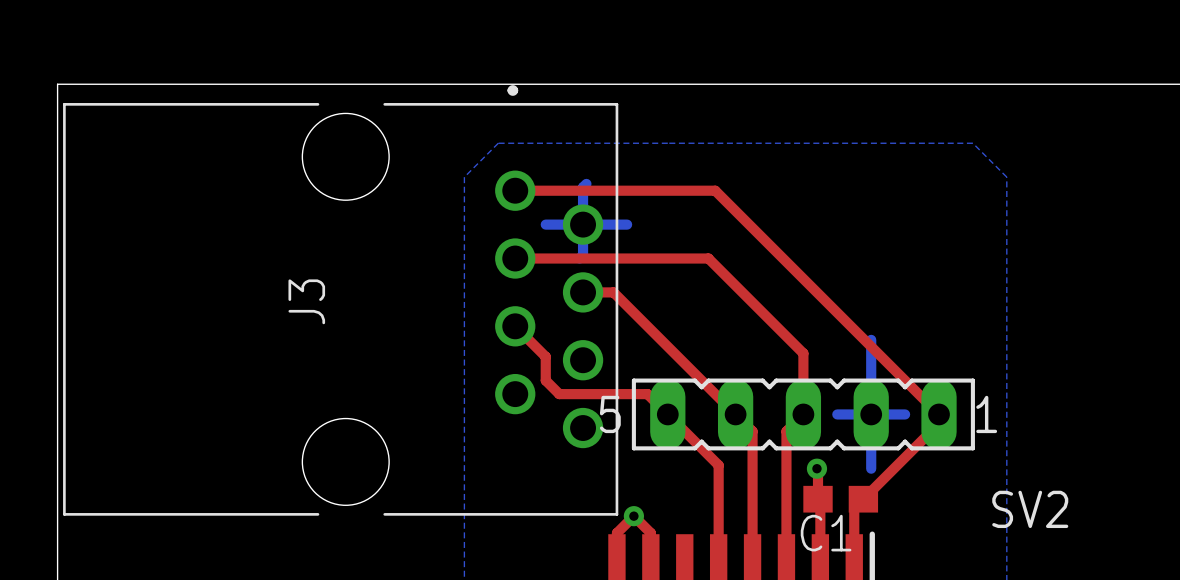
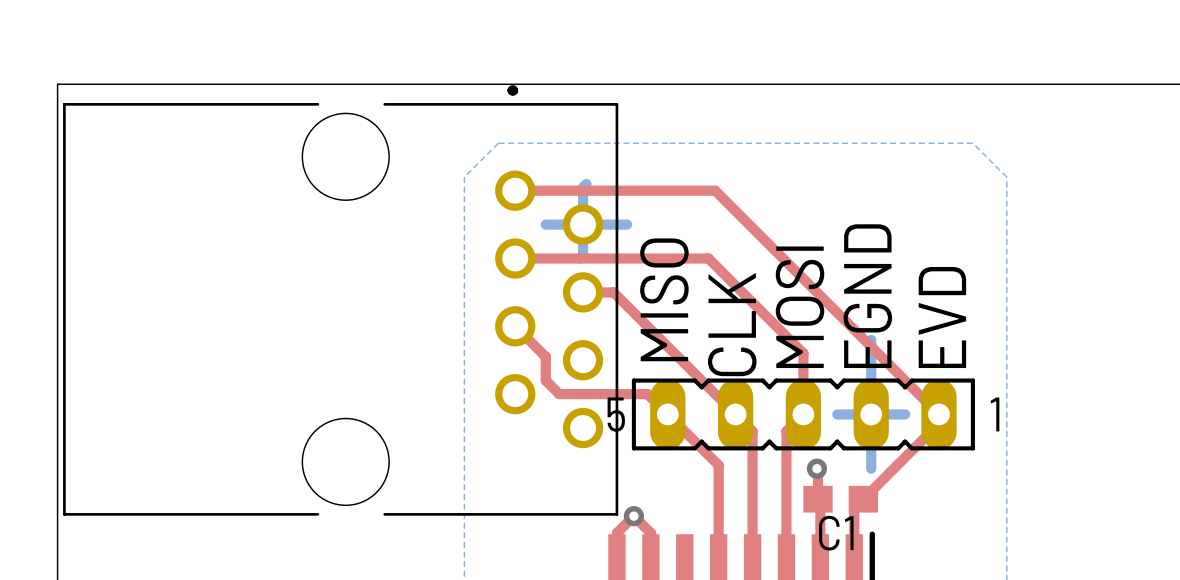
text: none -> EGND (867, 296)
text: none -> MISO (664, 299)
text: none -> MOSI (800, 307)
J3 name: J3 (306, 301) -> none
text: none -> EVD (942, 317)
text: none -> CLK (732, 324)
SV2 name: SV2 (1030, 509) -> none

